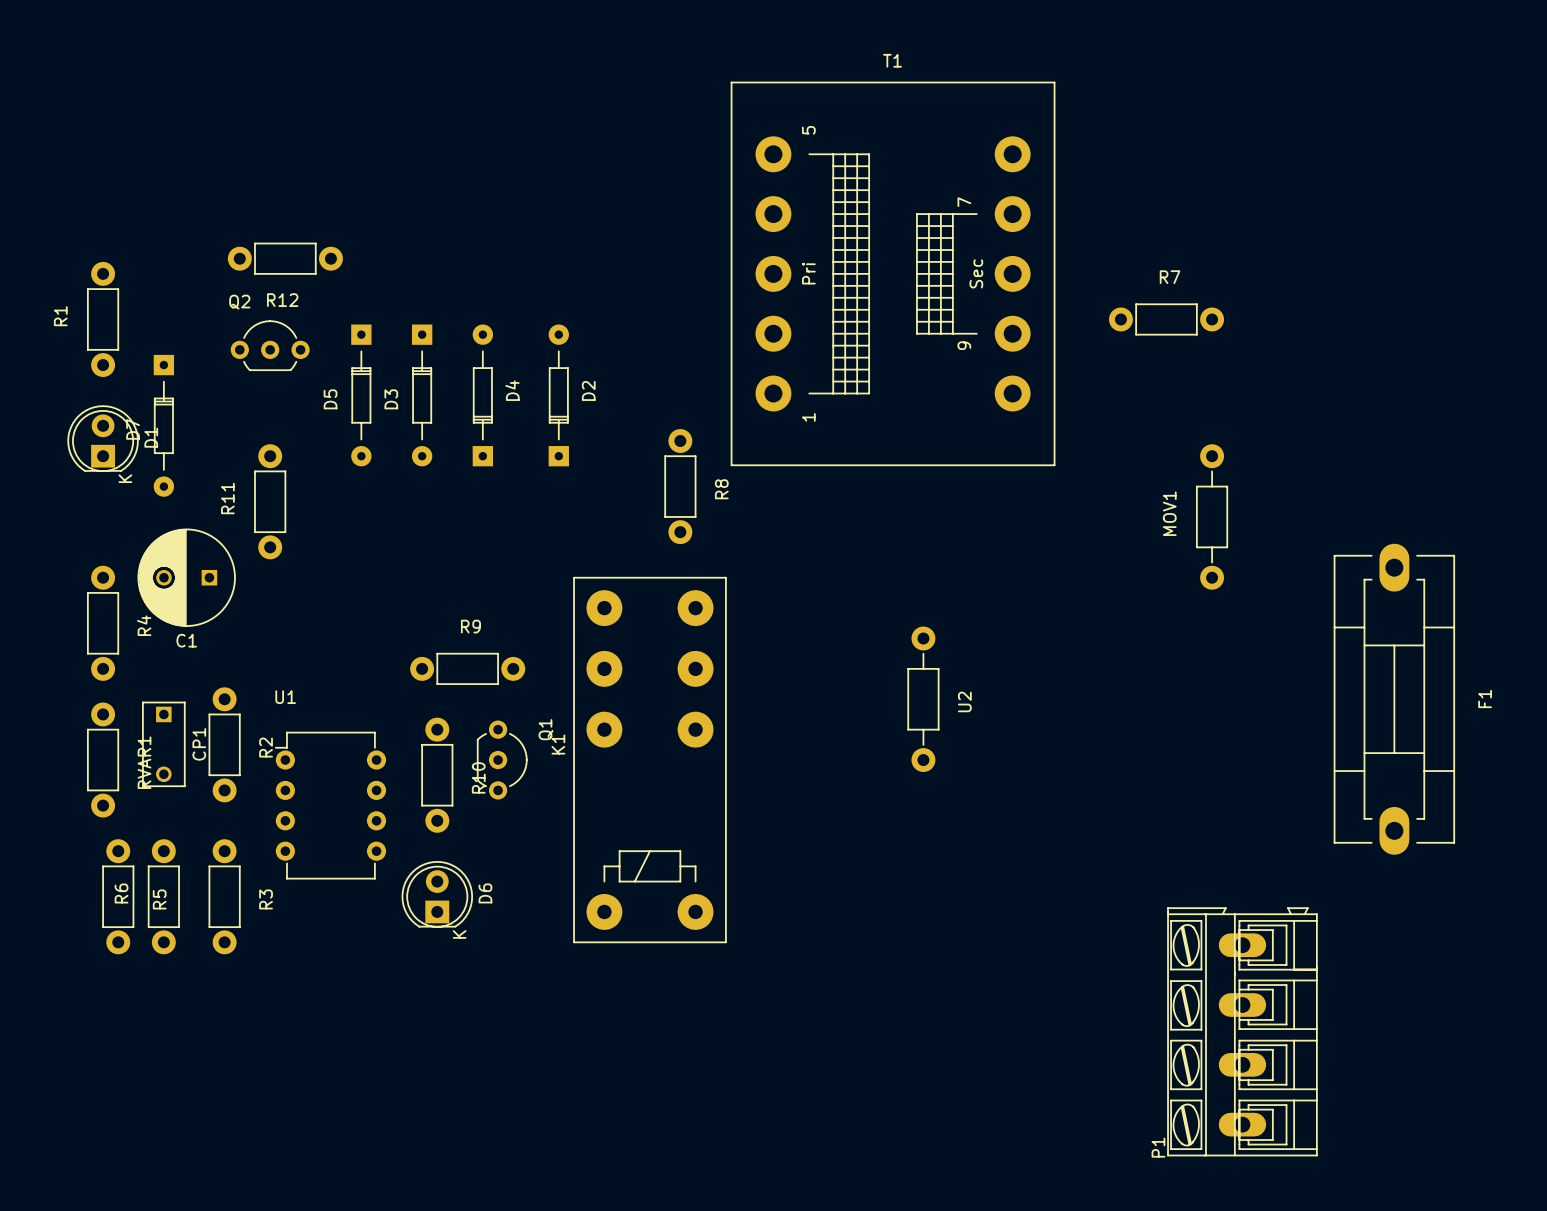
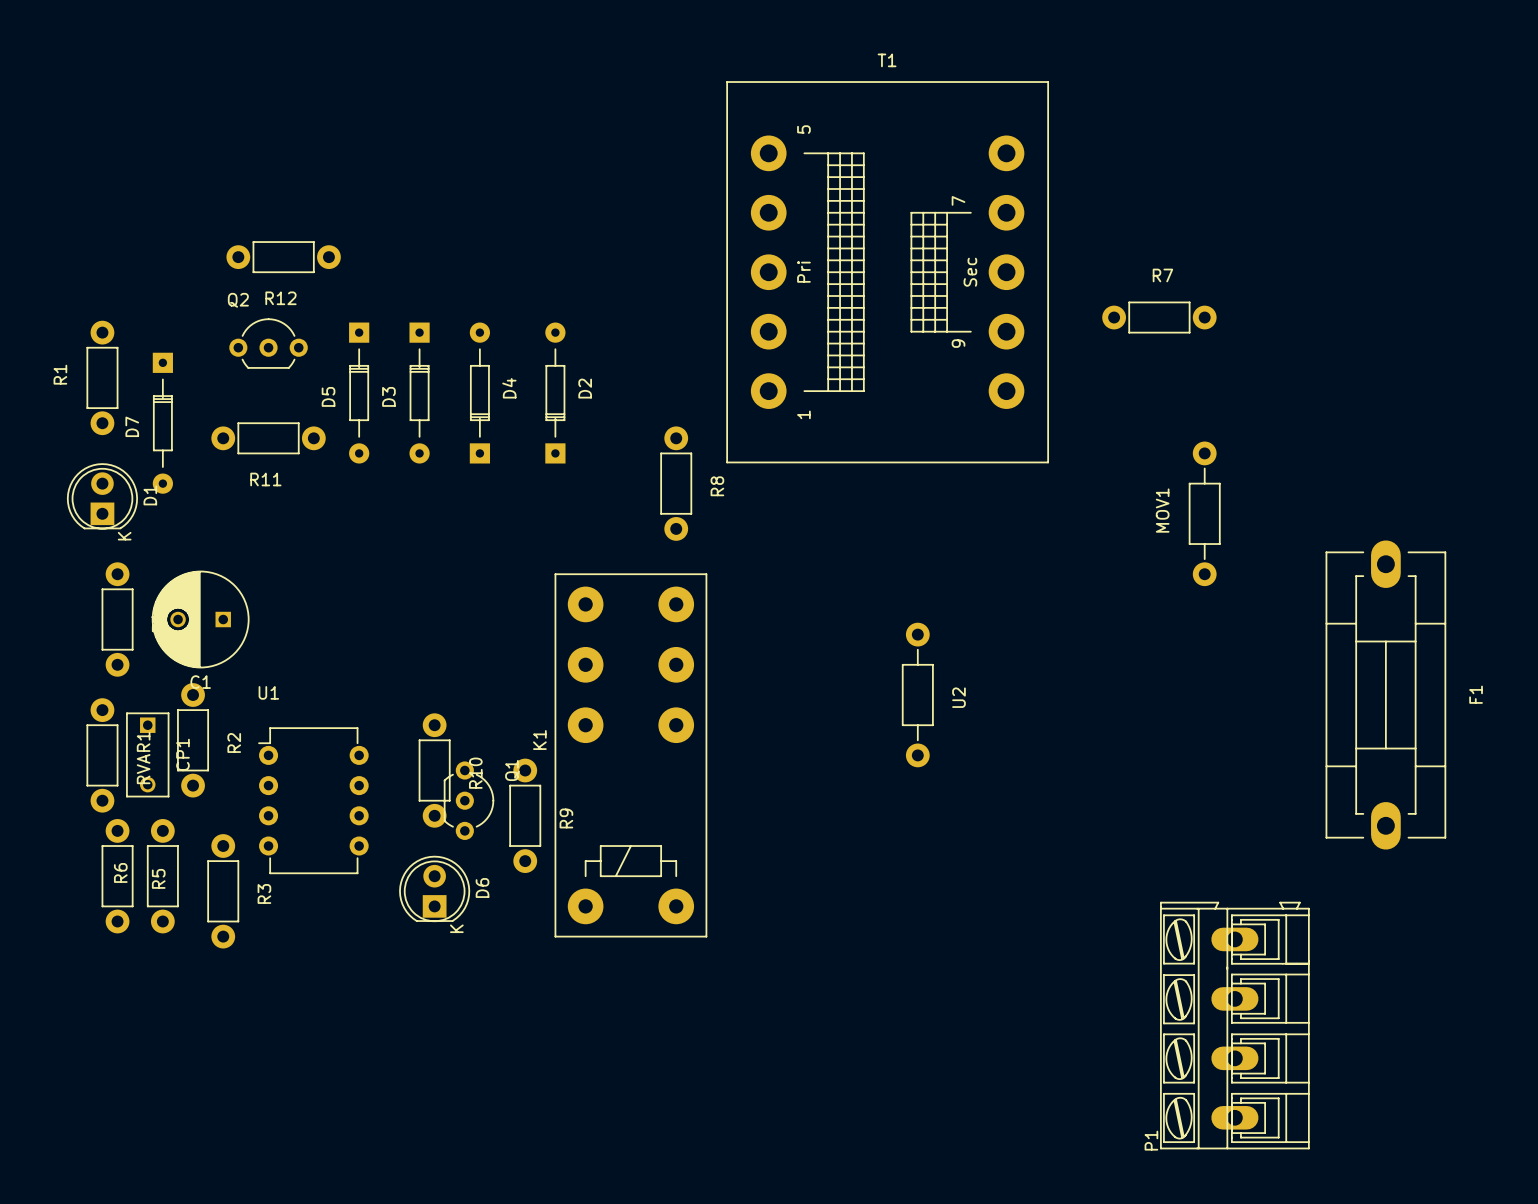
R1 position: (103, 319) -> (102, 377)
D1 position: (103, 438) -> (102, 496)
R11 name position: R11 (227, 498) -> R11 (265, 479)
R11 rotation: 0° (270, 501) -> 90° clockwise (268, 438)
C1 position: (186, 577) -> (200, 619)
R4 position: (103, 623) -> (117, 619)
R9 rotation: 0° (467, 668) -> 90° clockwise (525, 815)
R9 position: (467, 668) -> (525, 815)
CP1 position: (163, 744) -> (147, 754)
R2 position: (224, 744) -> (193, 740)
Q1 position: (502, 760) -> (469, 800)
K1 position: (649, 760) -> (630, 755)
U1 position: (330, 805) -> (313, 800)
R5 position: (118, 896) -> (117, 876)
R6 position: (163, 896) -> (162, 876)

